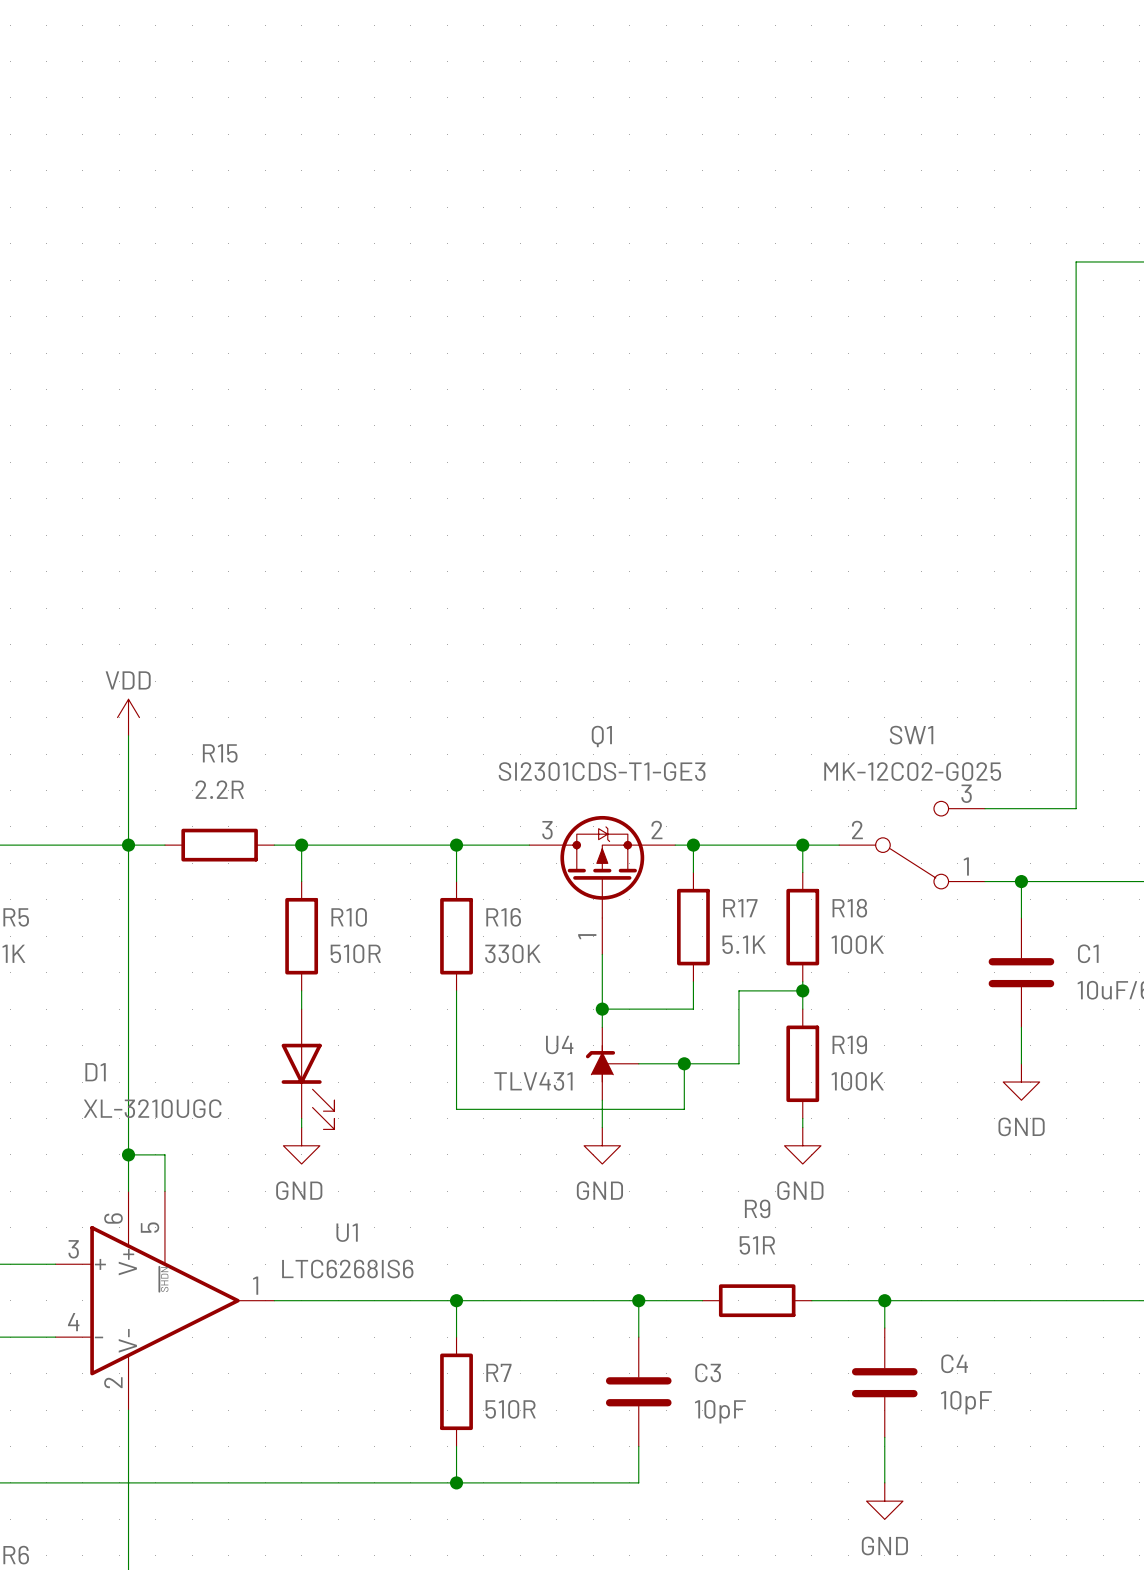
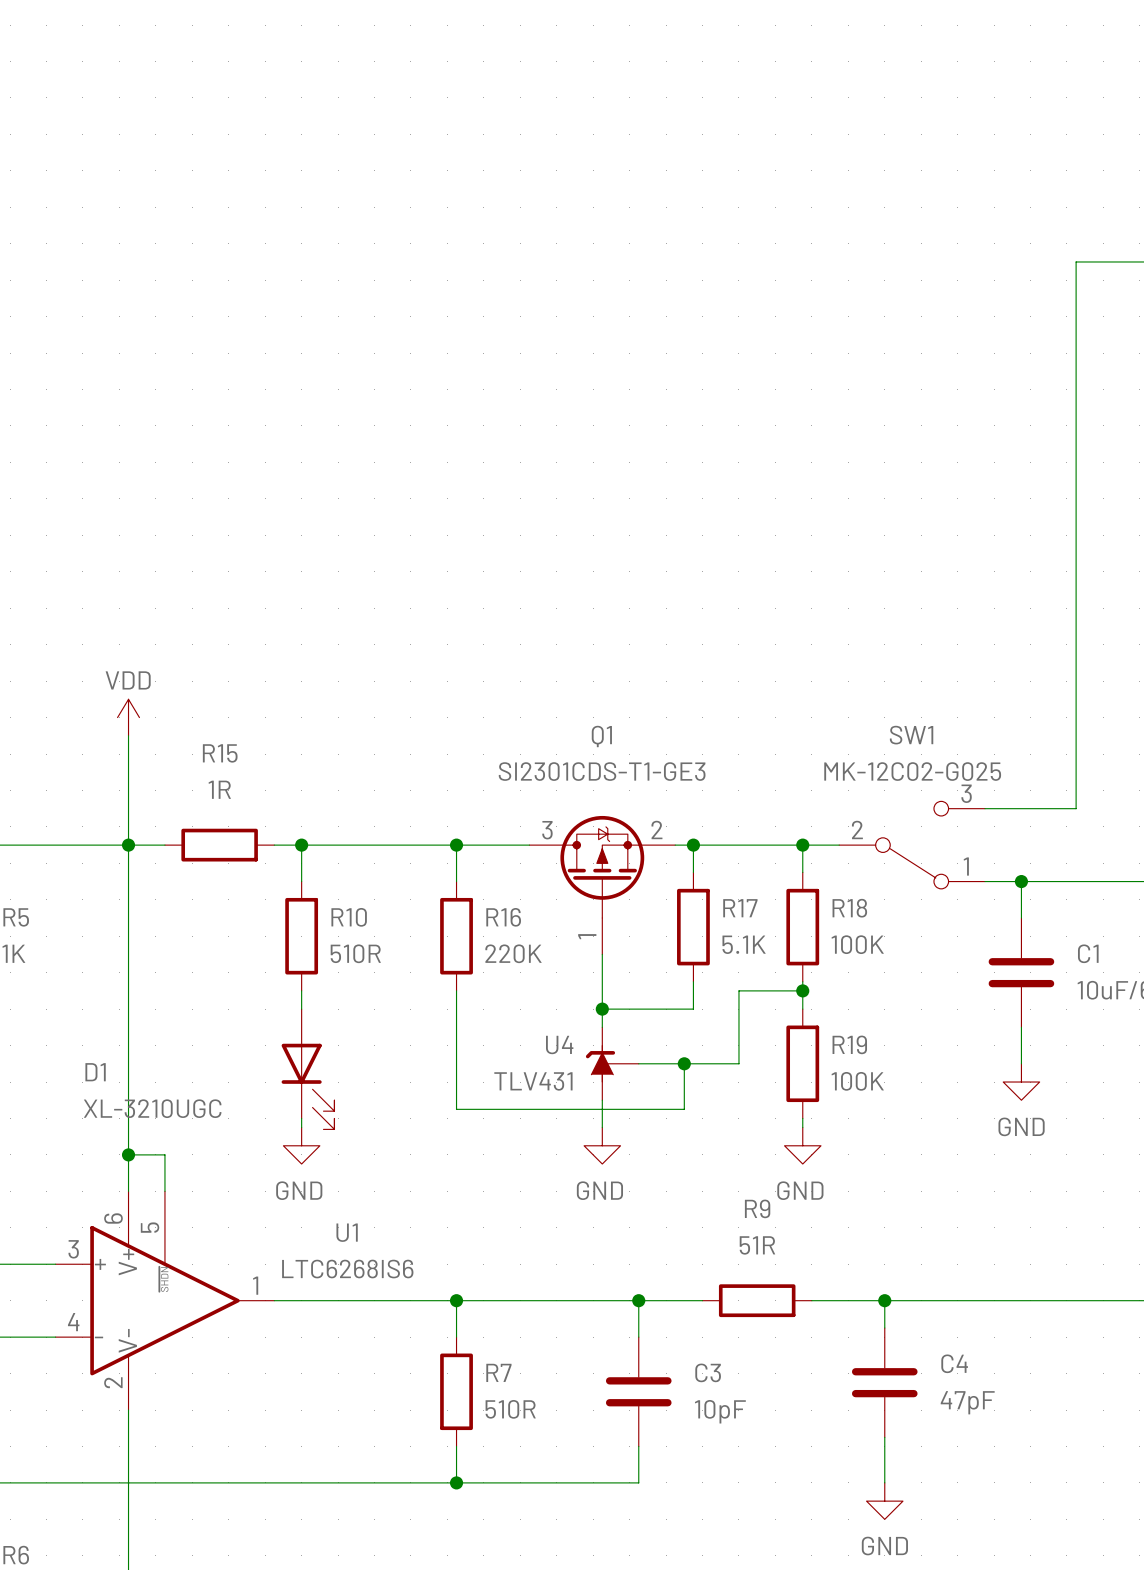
R15 value: 2.2R (219, 789) -> 1R (219, 789)
R16 value: 330K (512, 953) -> 220K (513, 953)
C4 value: 10pF (966, 1402) -> 47pF (967, 1402)

